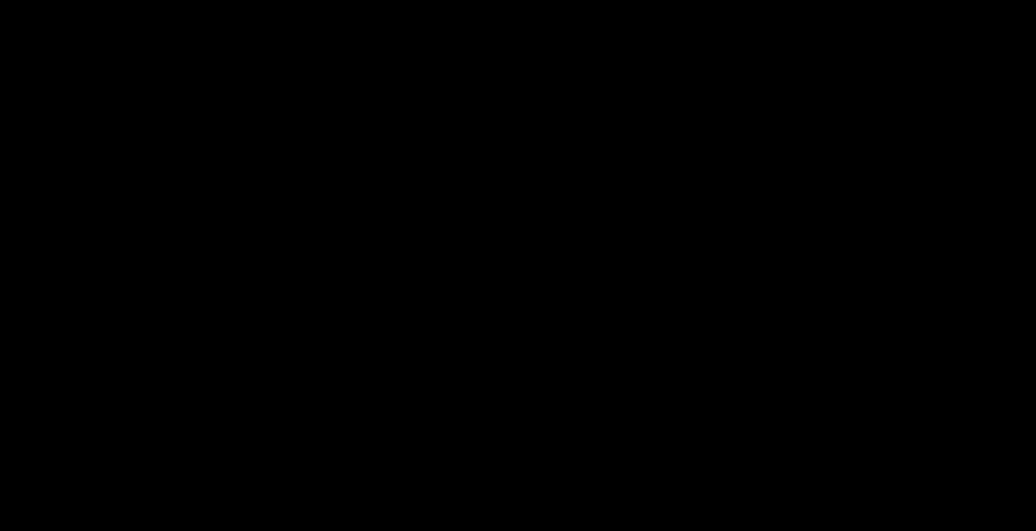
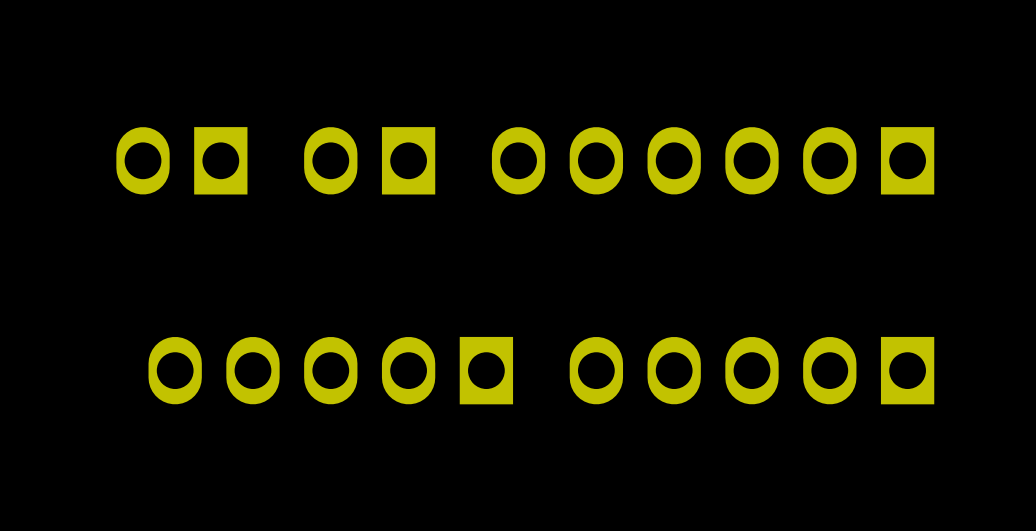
part: none -> (181, 160)
part: none -> (369, 160)
part: none -> (713, 160)
part: none -> (330, 370)
part: none -> (751, 370)

